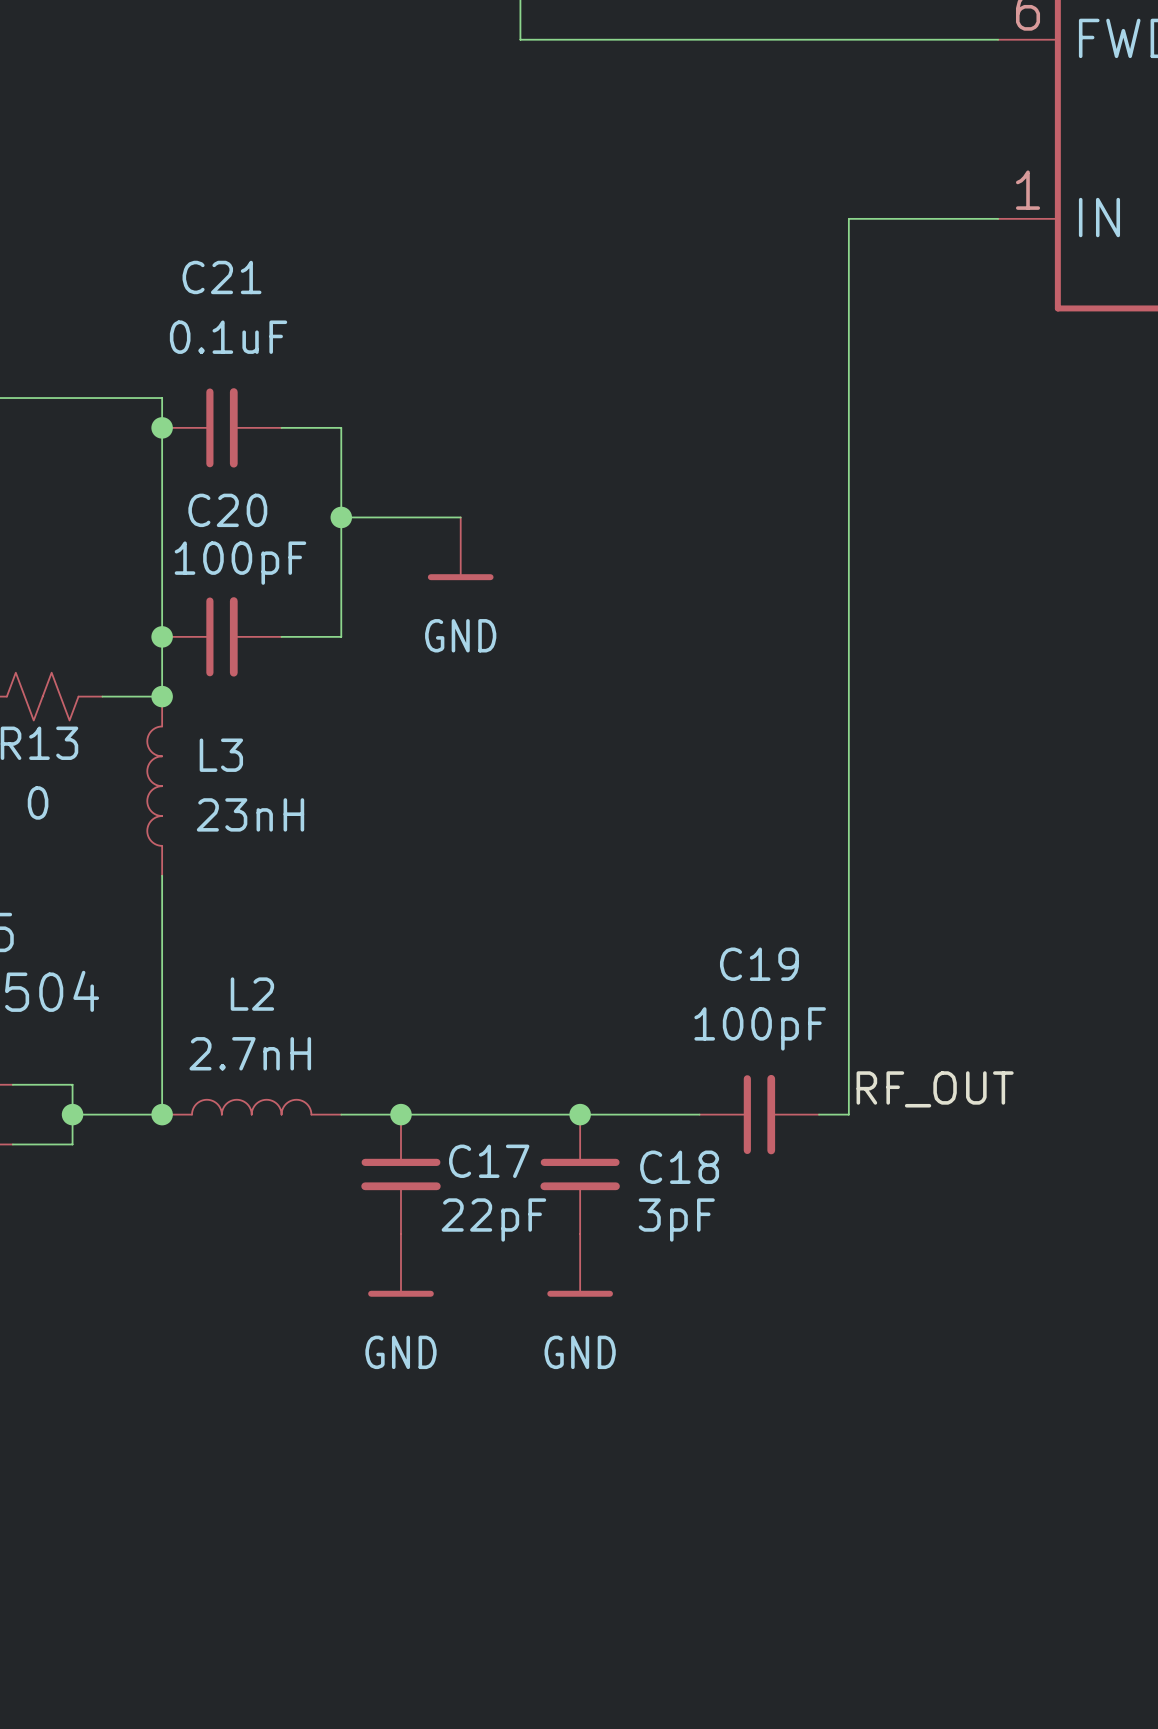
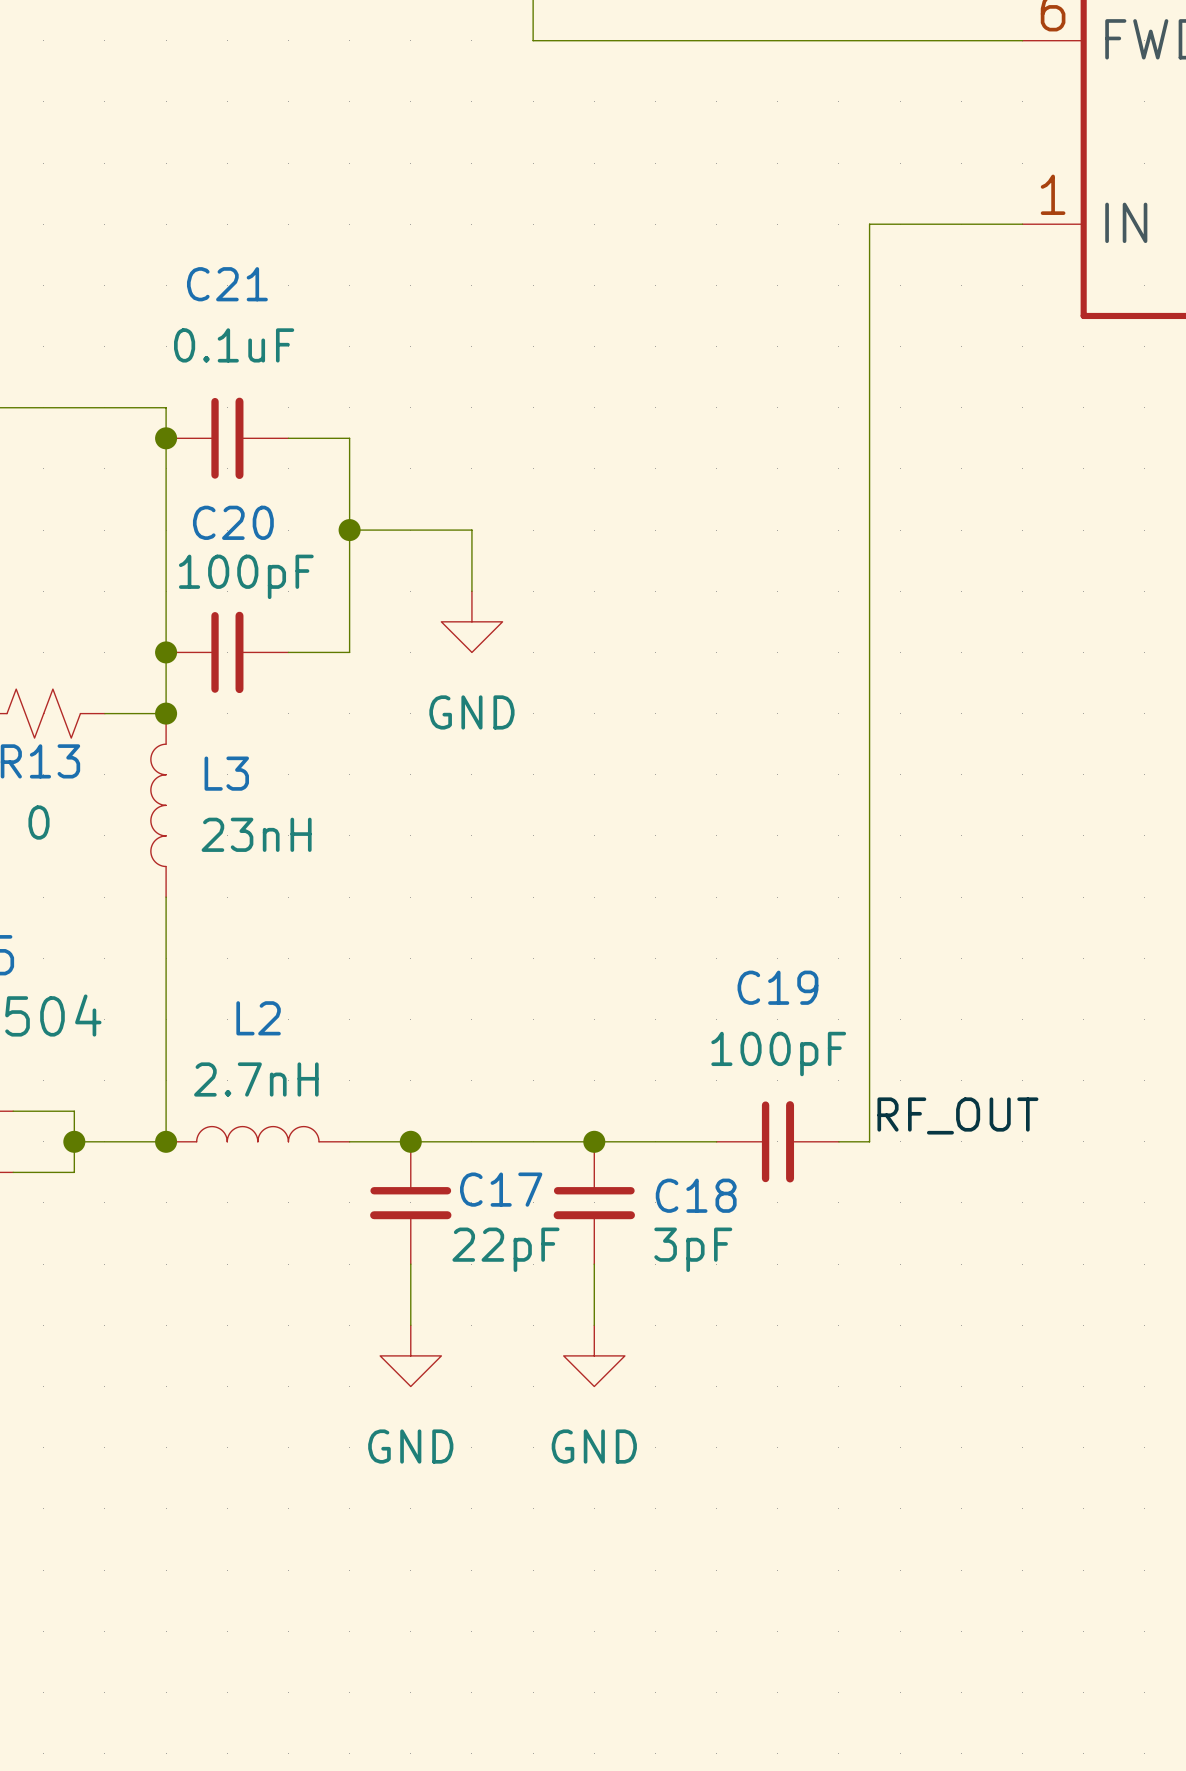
power symbol: GND (460, 548) -> none
power symbol: none -> GND (471, 621)
power symbol: GND (400, 1265) -> none
power symbol: GND (580, 1265) -> none
power symbol: none -> GND (410, 1355)
power symbol: none -> GND (594, 1355)

